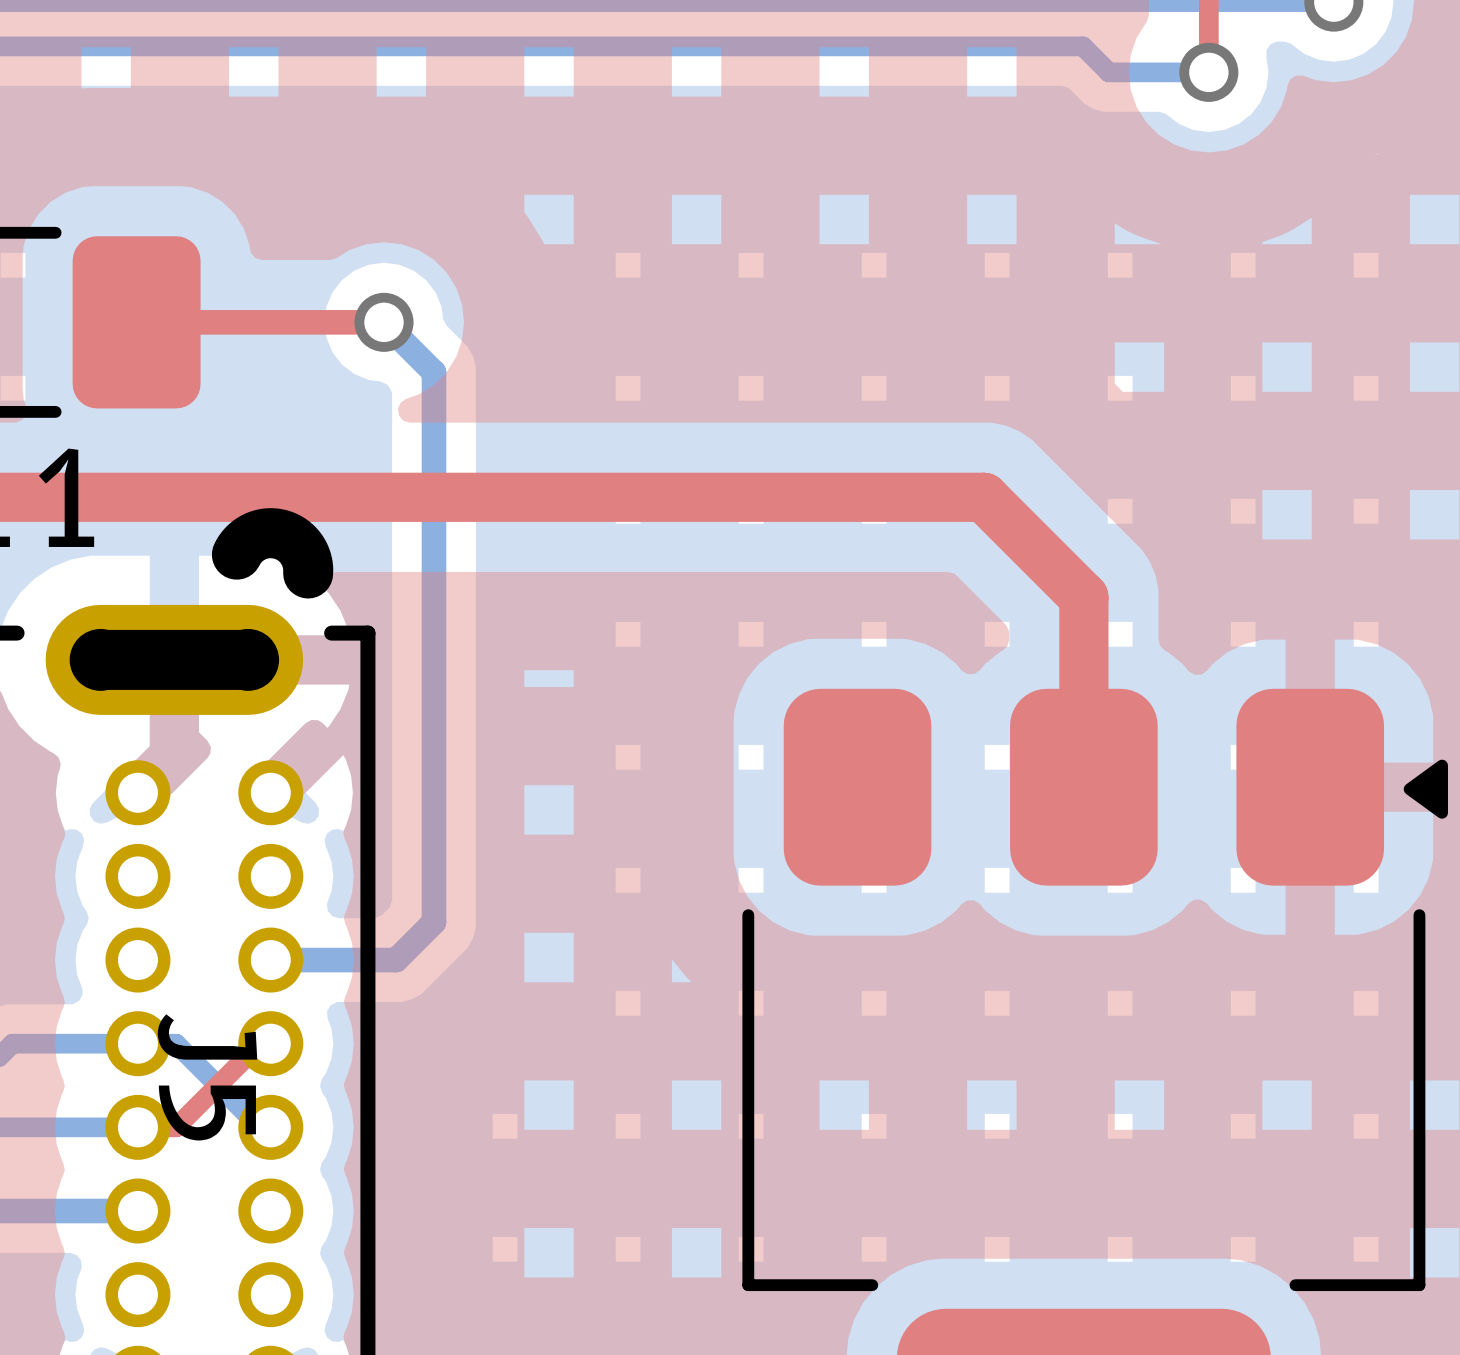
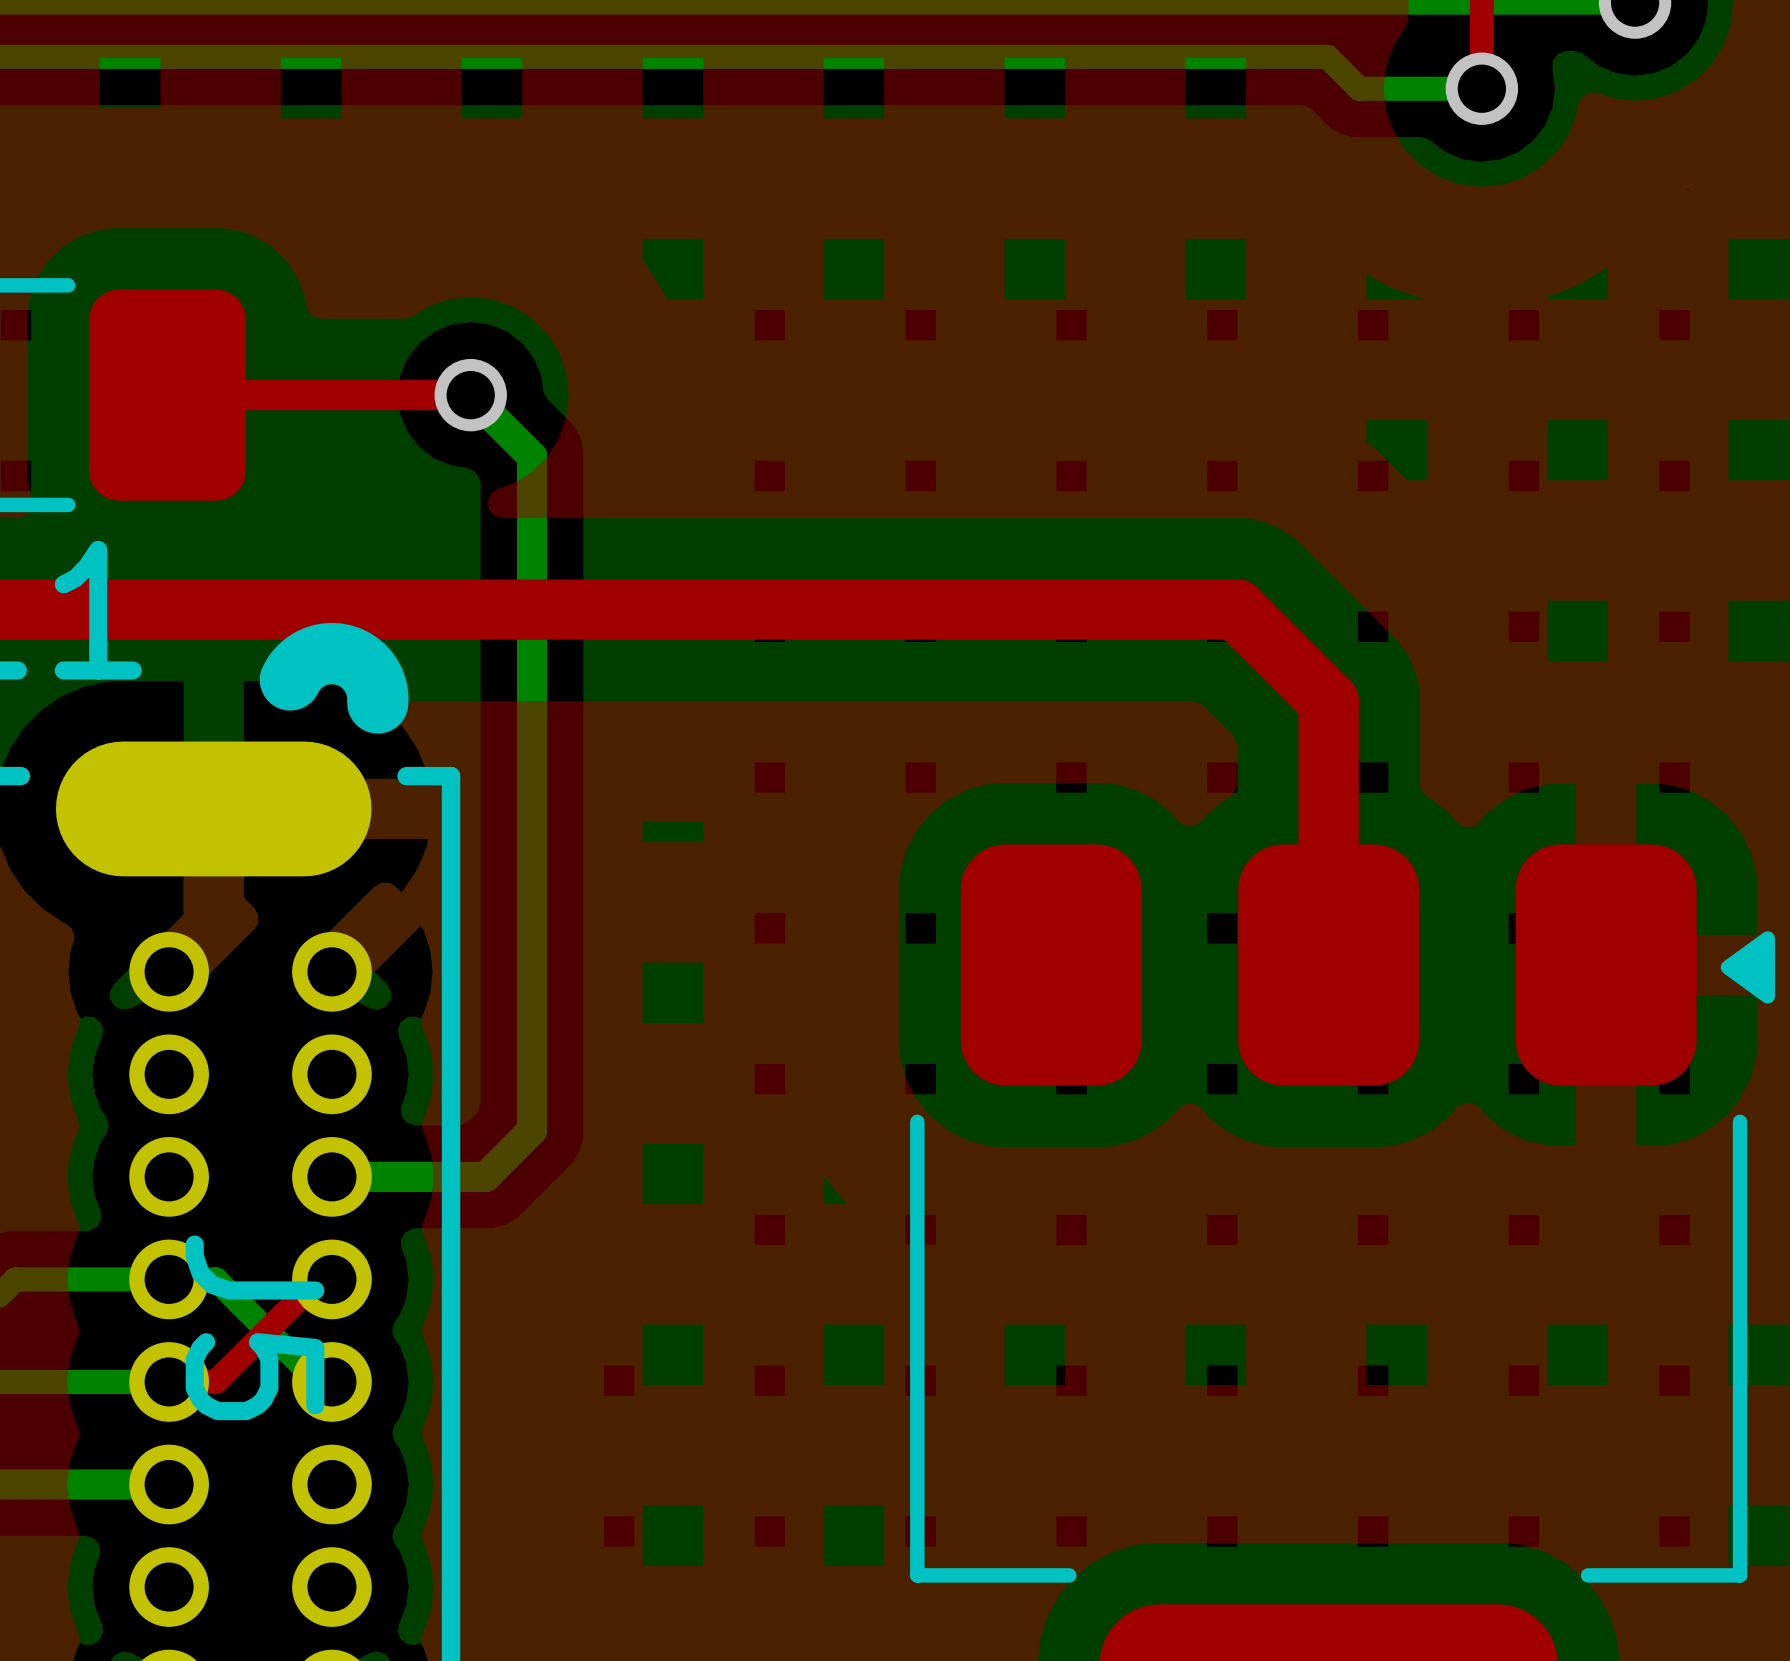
top track: (983, 497) (1083, 597) -> (1206, 609) (1236, 609) (1328, 701) (1328, 732)

